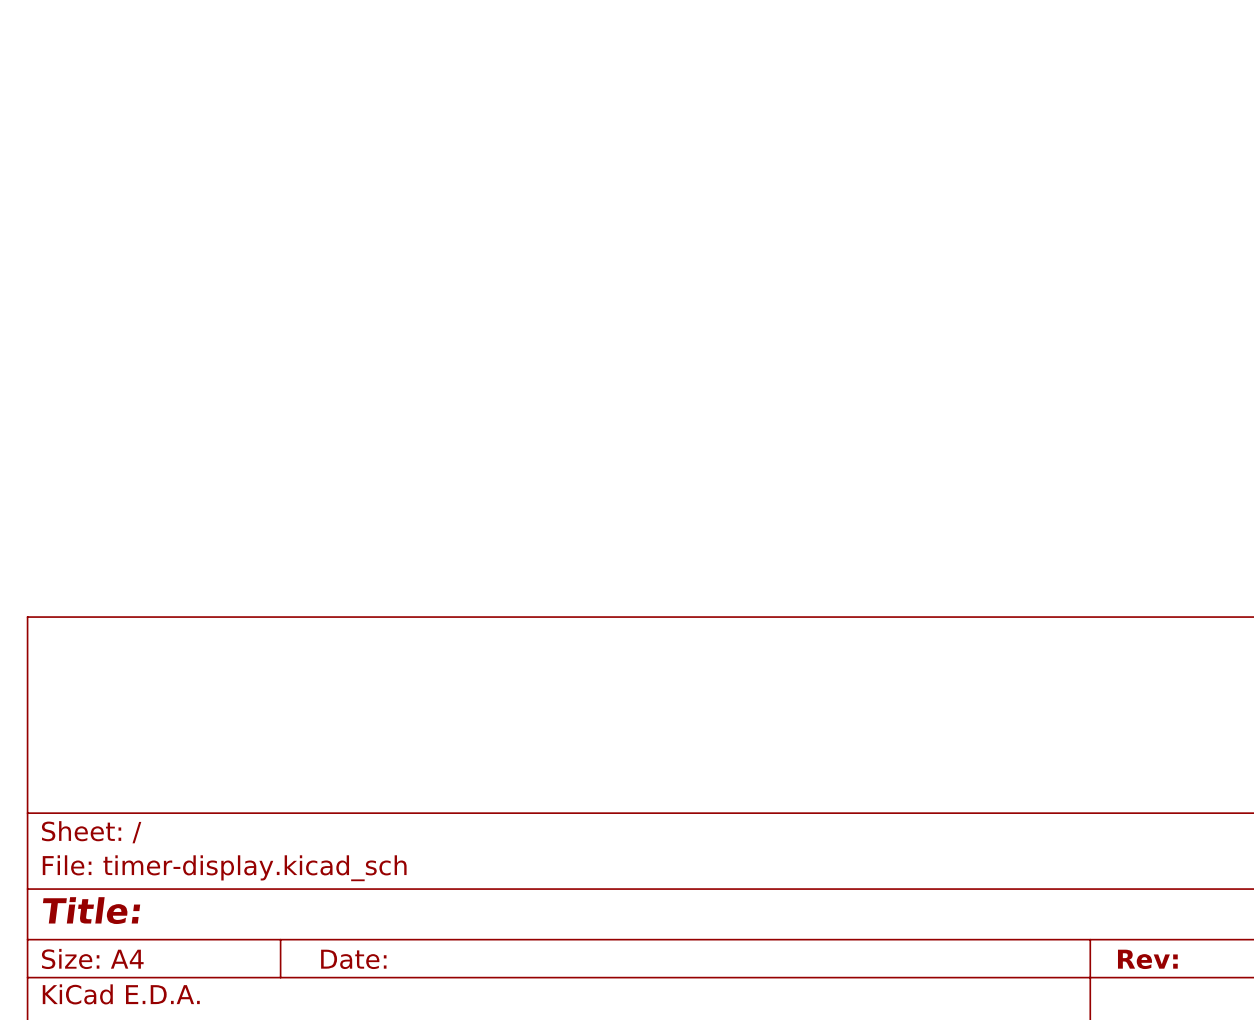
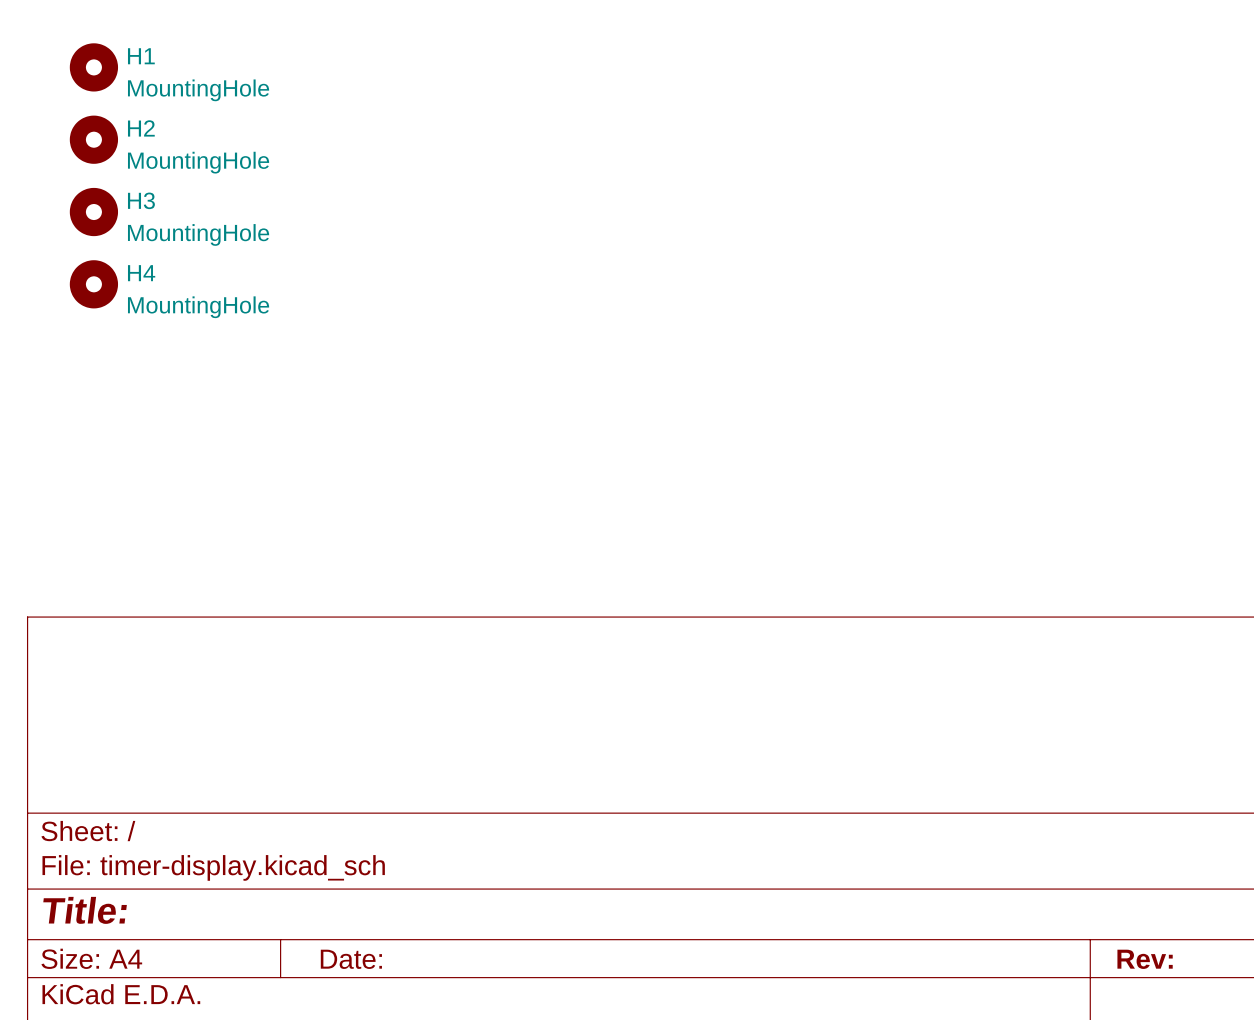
H1: none -> MountingHole (93, 67)
H2: none -> MountingHole (93, 139)
H3: none -> MountingHole (93, 212)
H4: none -> MountingHole (93, 284)

